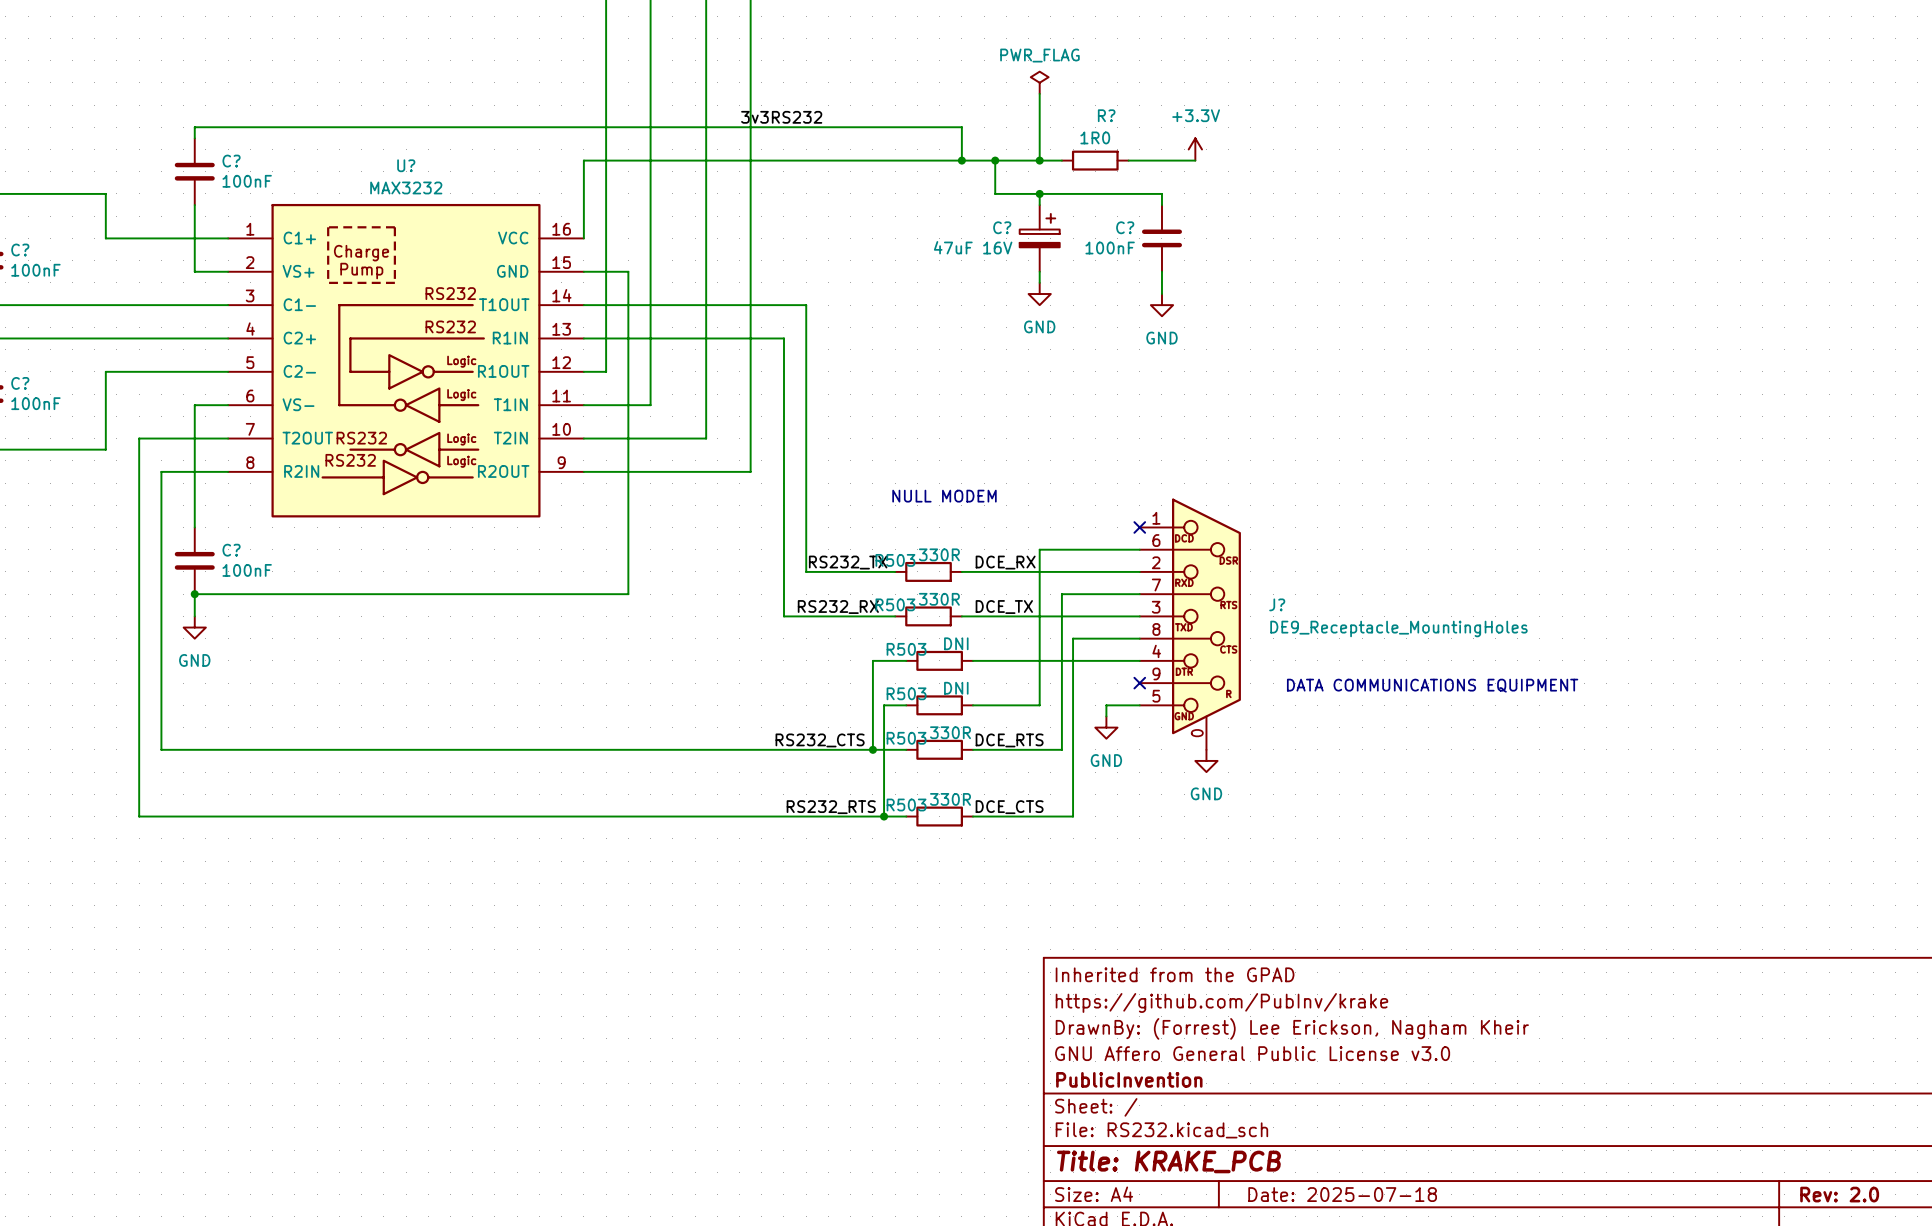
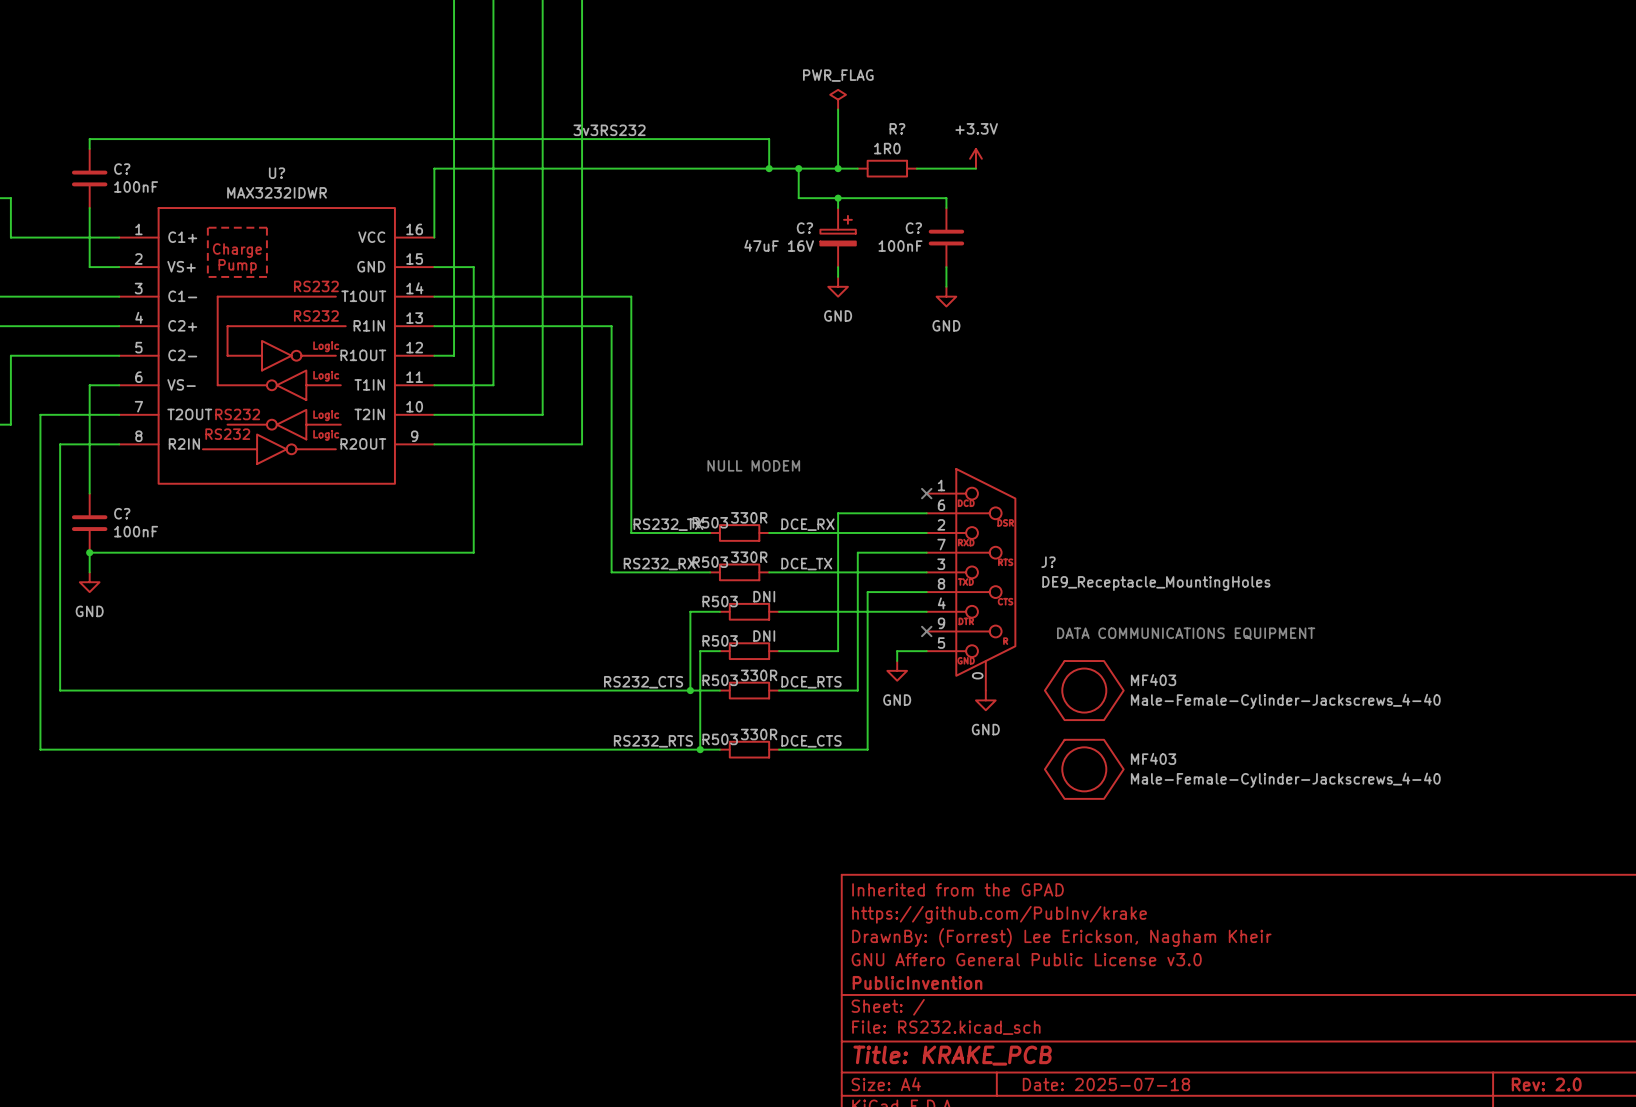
U? value: MAX3232 (406, 187) -> MAX3232IDWR (277, 192)
MF403: none -> Male-Female-Cylinder-Jackscrews_4-40 (1084, 690)
MF403: none -> Male-Female-Cylinder-Jackscrews_4-40 (1084, 769)

